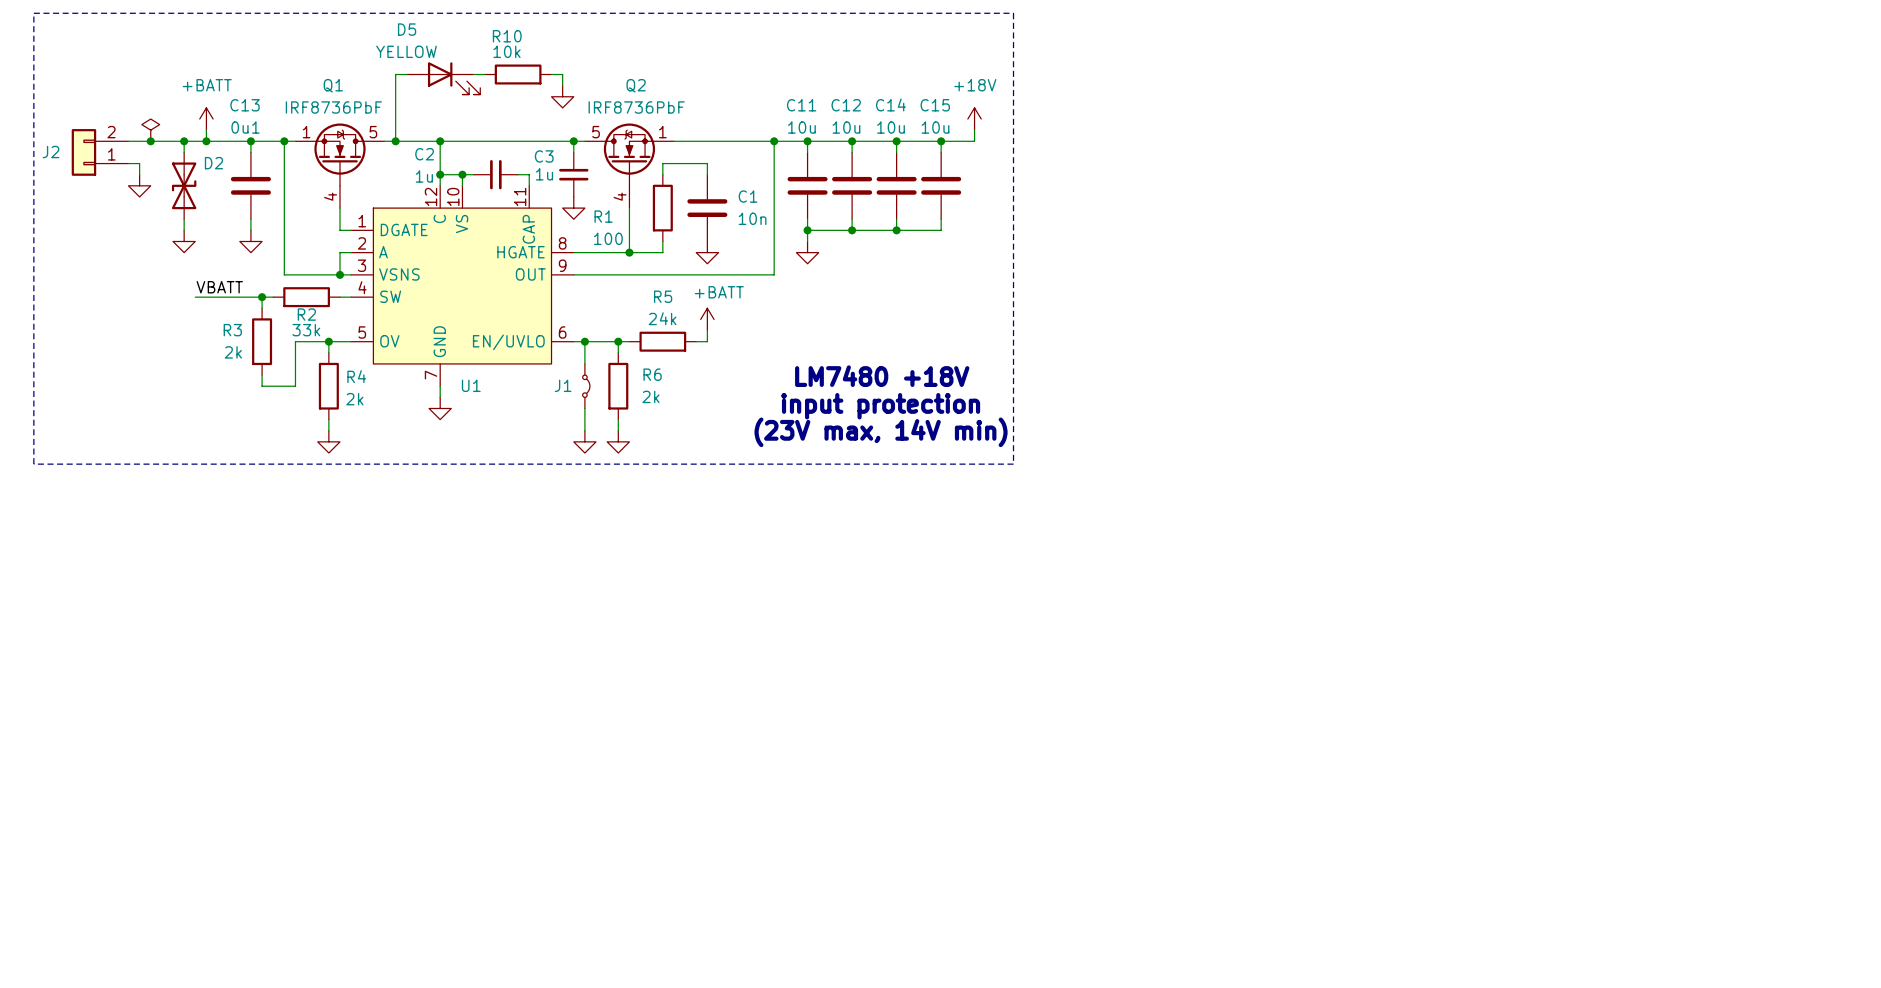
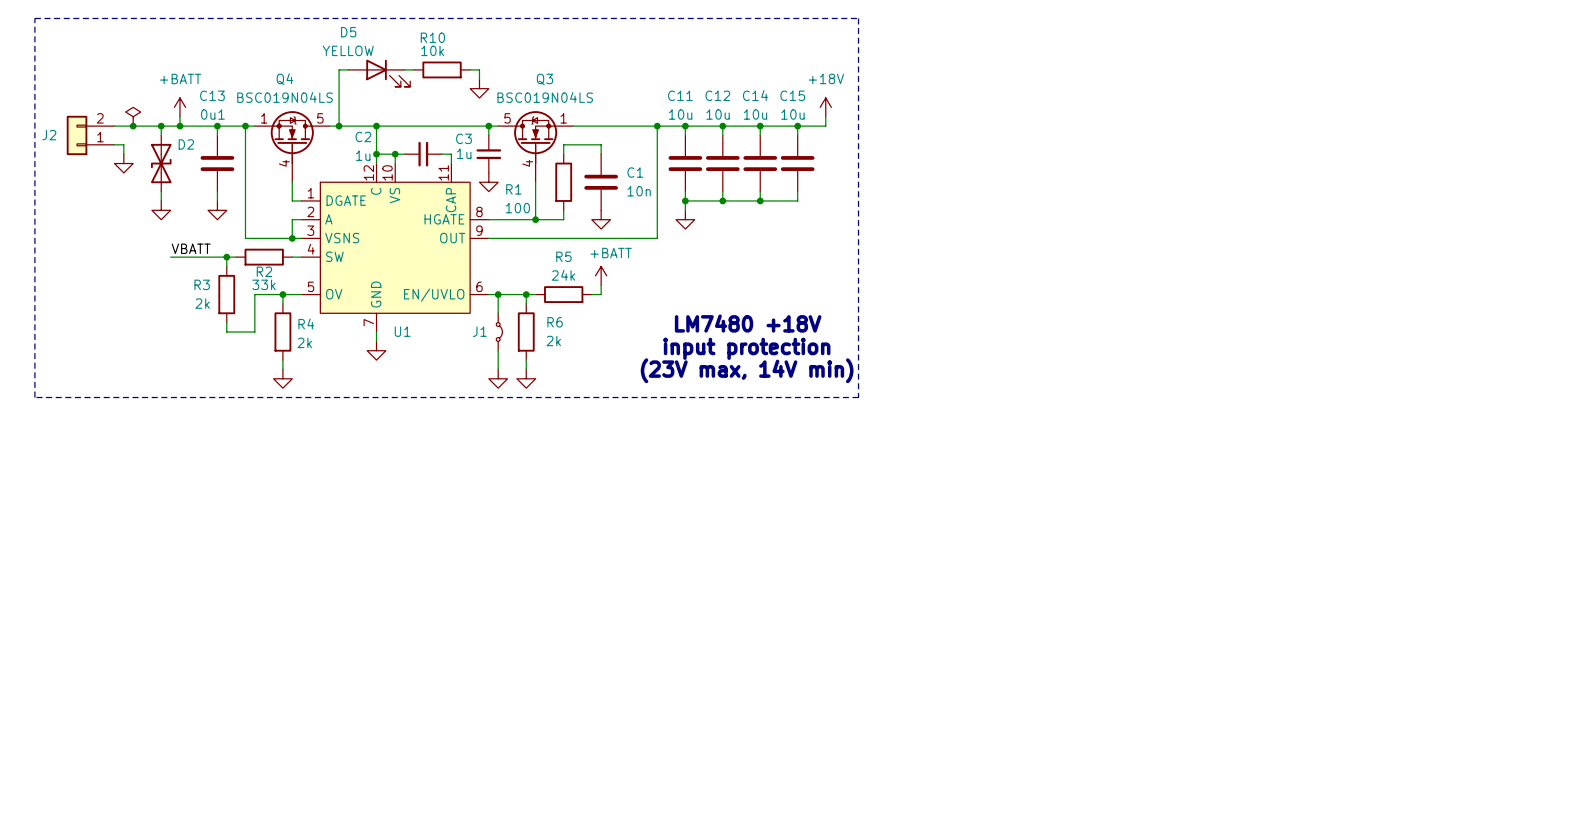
Q1: IRF8736PbF (340, 165) -> none
Q4: none -> BSC019N04LS (292, 146)
Q2: IRF8736PbF (629, 165) -> none
Q3: none -> BSC019N04LS (535, 146)

